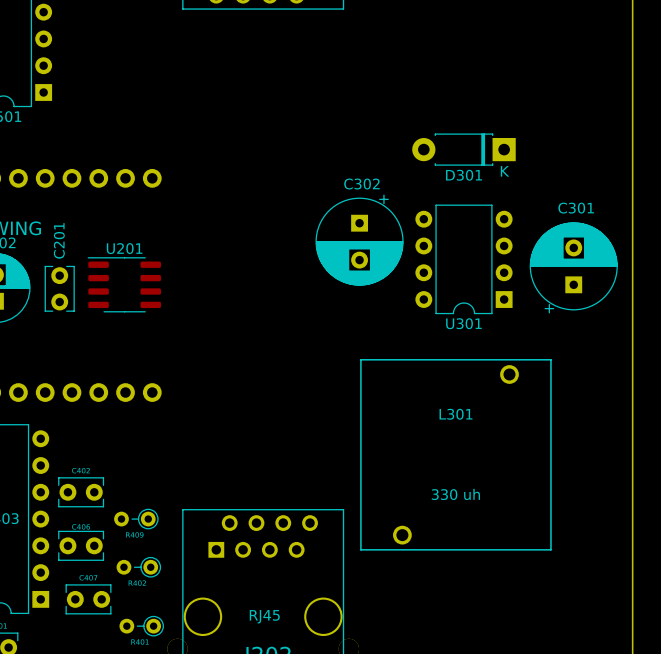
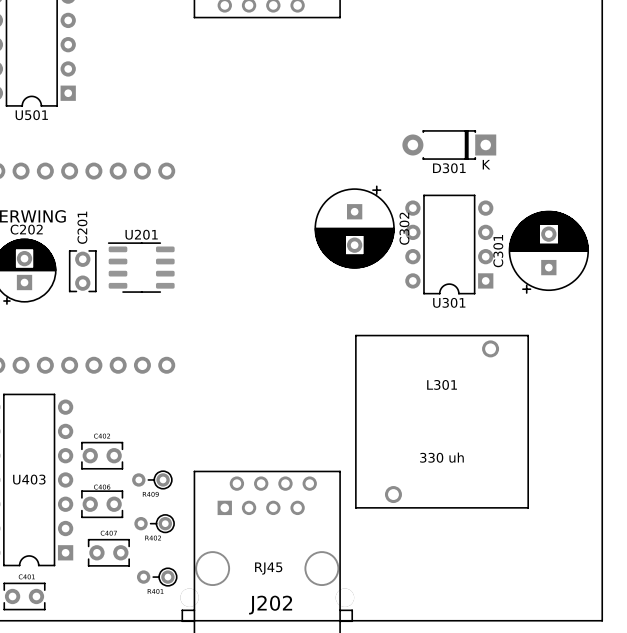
C302 name rotation: 0° (361, 184) -> 90° counterclockwise (404, 228)
C302 name position: C302 (361, 184) -> C302 (404, 228)
C301 name rotation: 0° (576, 208) -> 90° counterclockwise (498, 251)
C301 name position: C301 (576, 208) -> C301 (498, 251)

